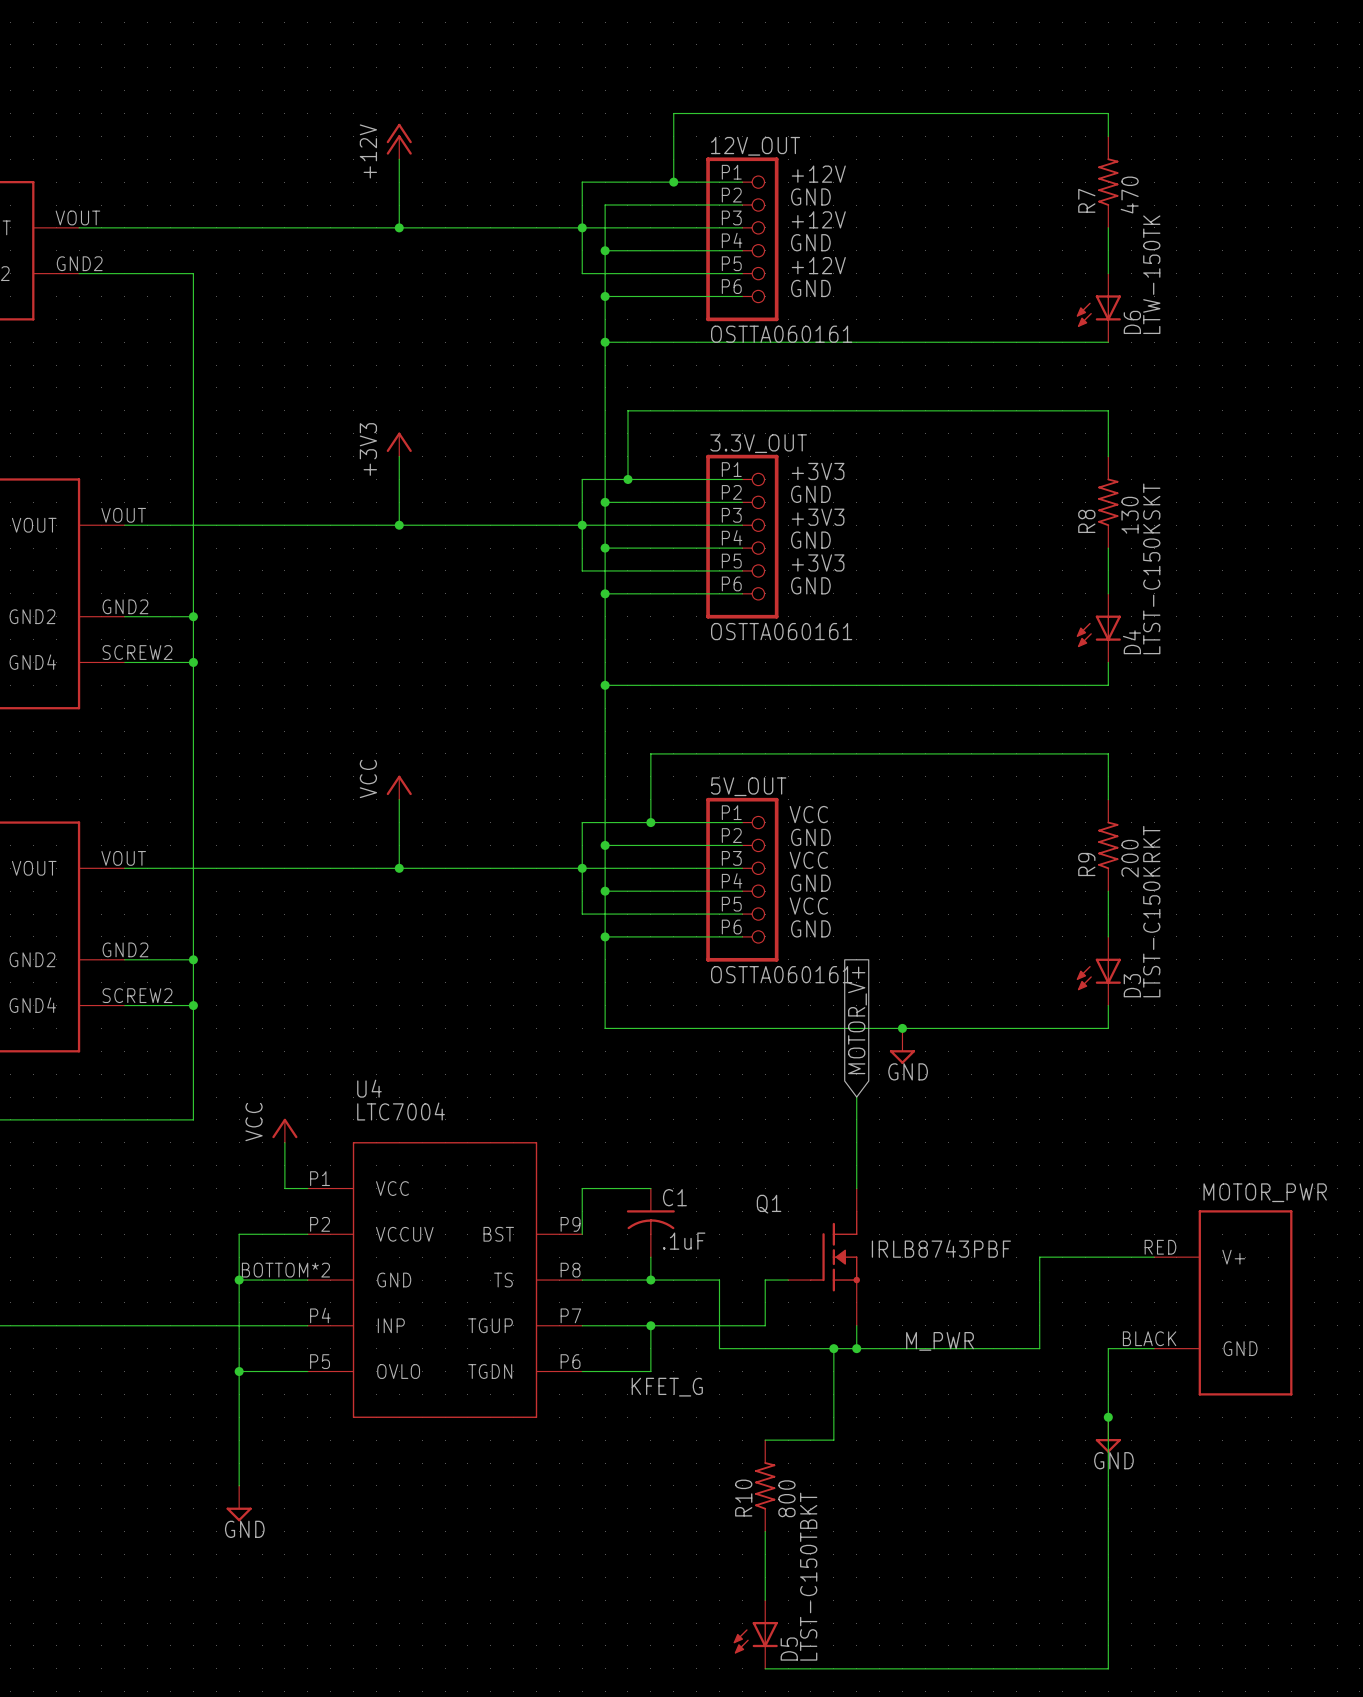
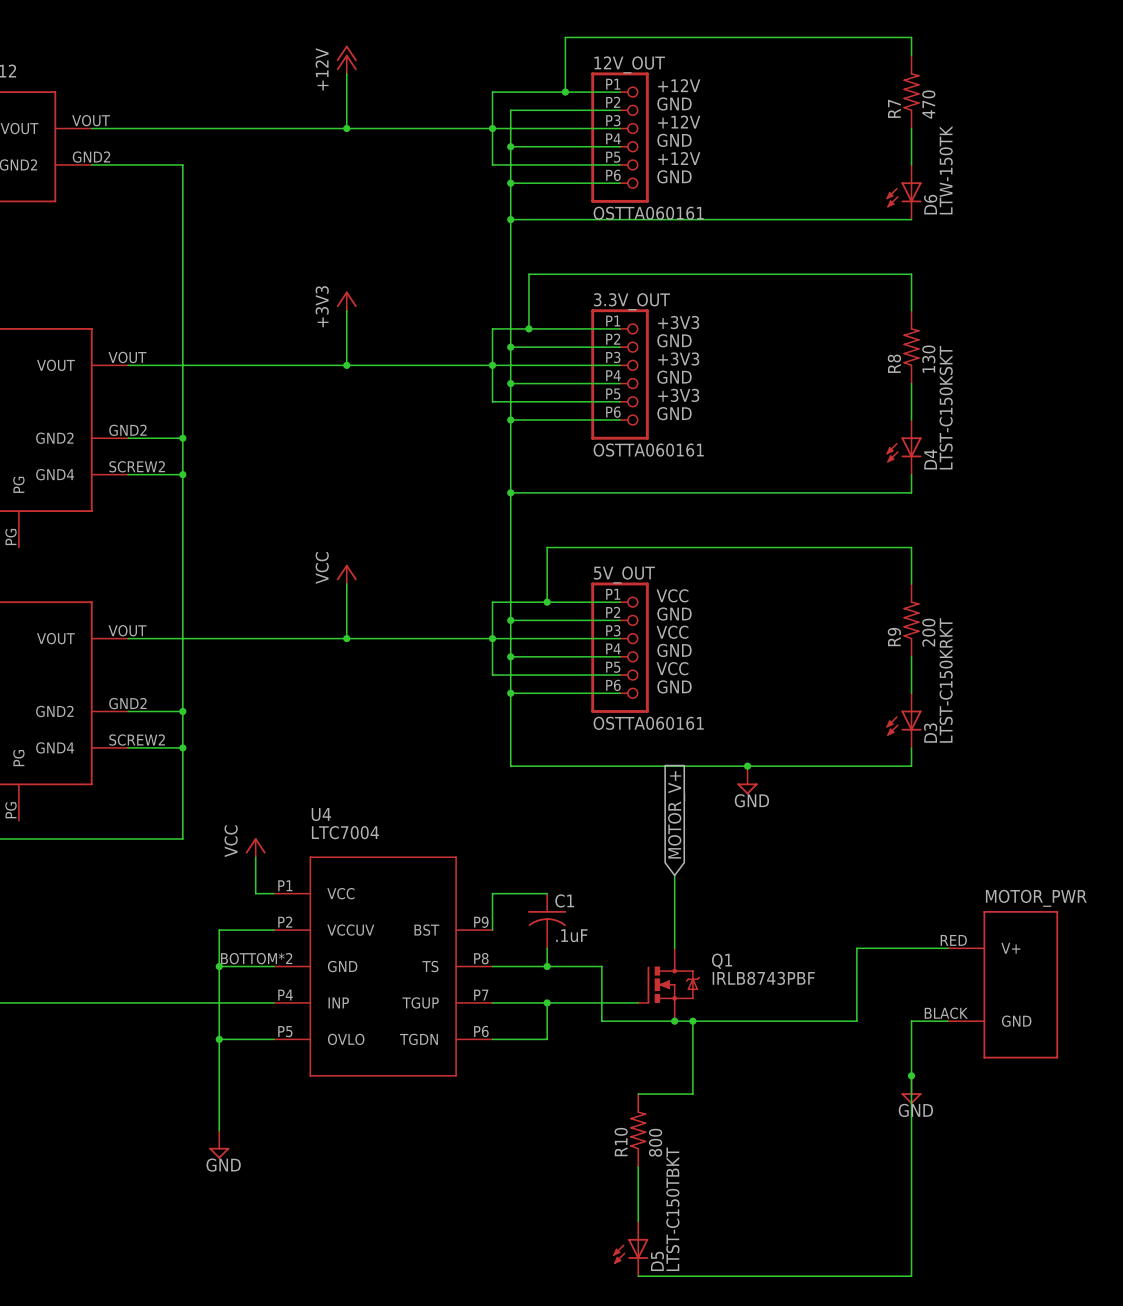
global label position: MOTOR_V+ (857, 1020) -> MOTOR_V+ (676, 814)
wire: (856, 1097) (856, 1188) -> (674, 875) (674, 948)
Q1 symbol: [788, 1188, 860, 1326] -> [637, 948, 700, 1022]
Q1 name position: Q1 (769, 1204) -> Q1 (722, 961)
wire: (788, 1280) (765, 1280) (765, 1325) -> none
wire: (856, 1325) (856, 1348) -> none
label: M_PWR (940, 1341) -> none
junction position: (856, 1348) -> (674, 1021)
label: KFET_G (667, 1387) -> none

